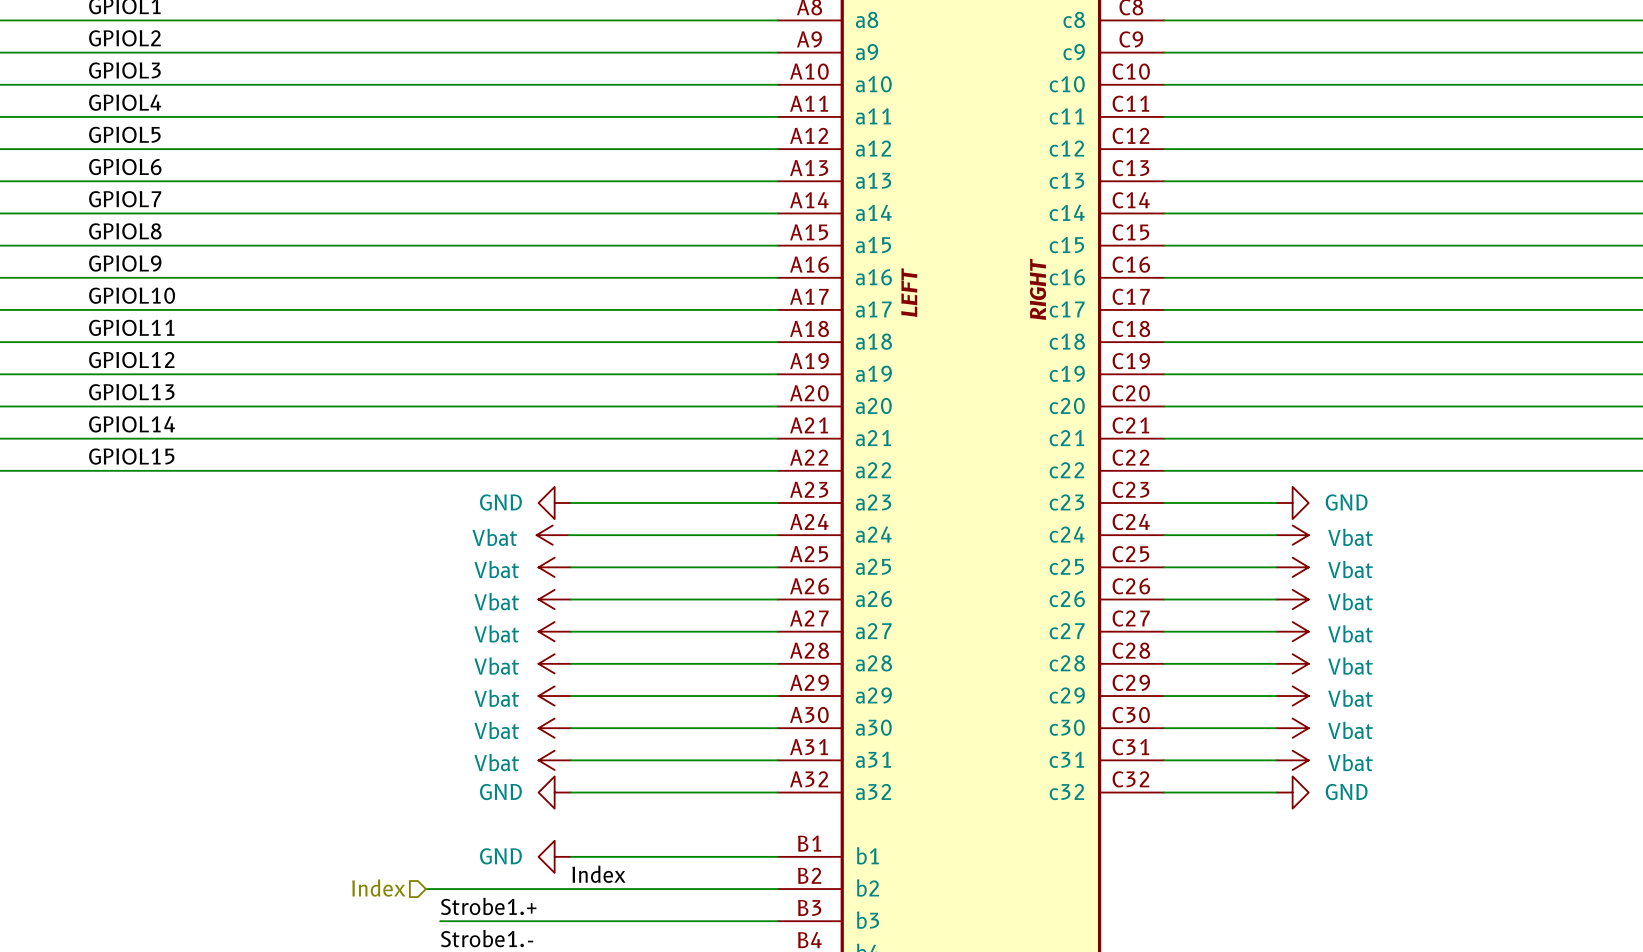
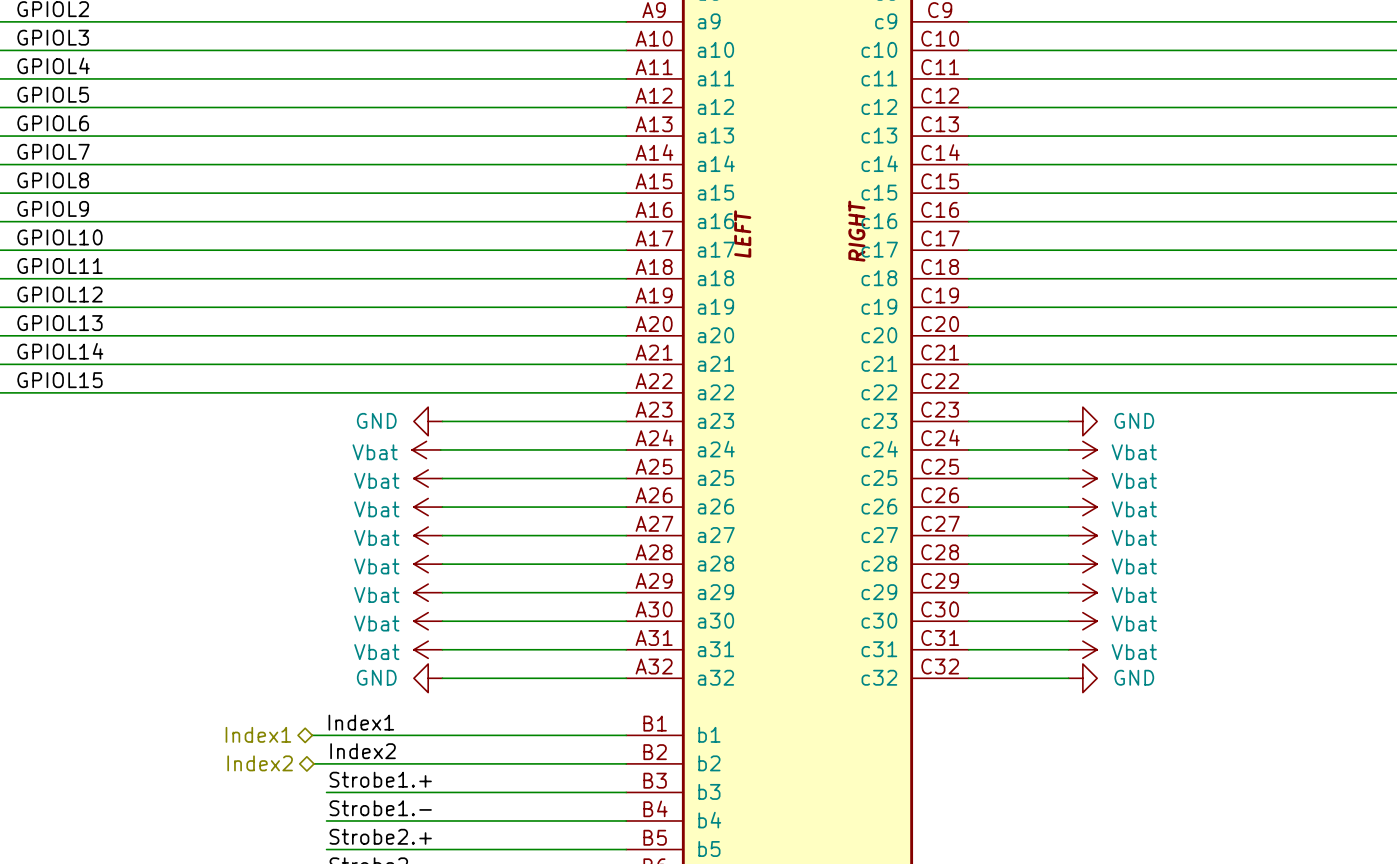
label: none -> Index1 (361, 722)
hierarchical label: none -> Index1 (258, 734)
wire: none -> (312, 735) (442, 735)
power symbol: GND (554, 856) -> none
label: none -> Index2 (363, 751)
label: Index (598, 874) -> none
hierarchical label shape: input (378, 887) -> bidirectional (260, 763)
hierarchical label: Index (378, 887) -> Index2 (260, 763)

